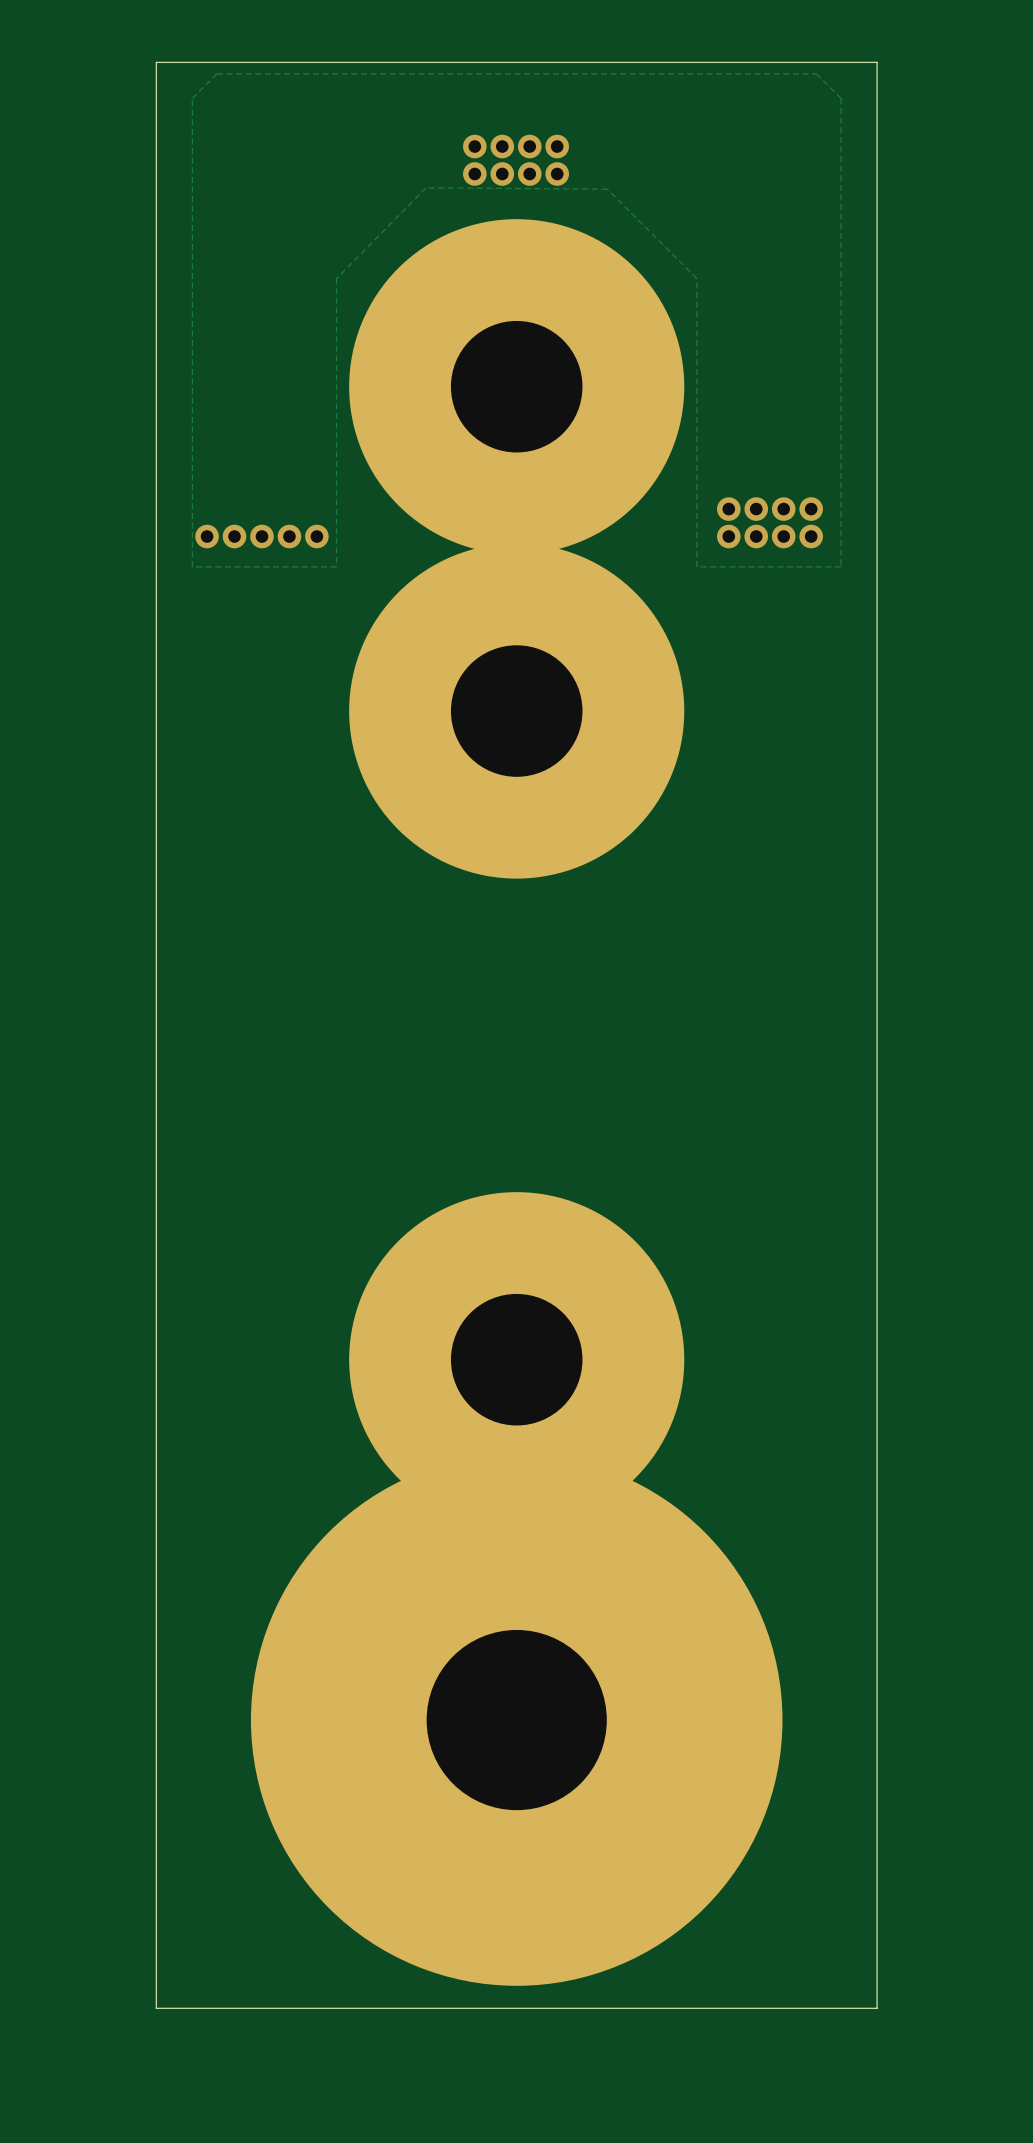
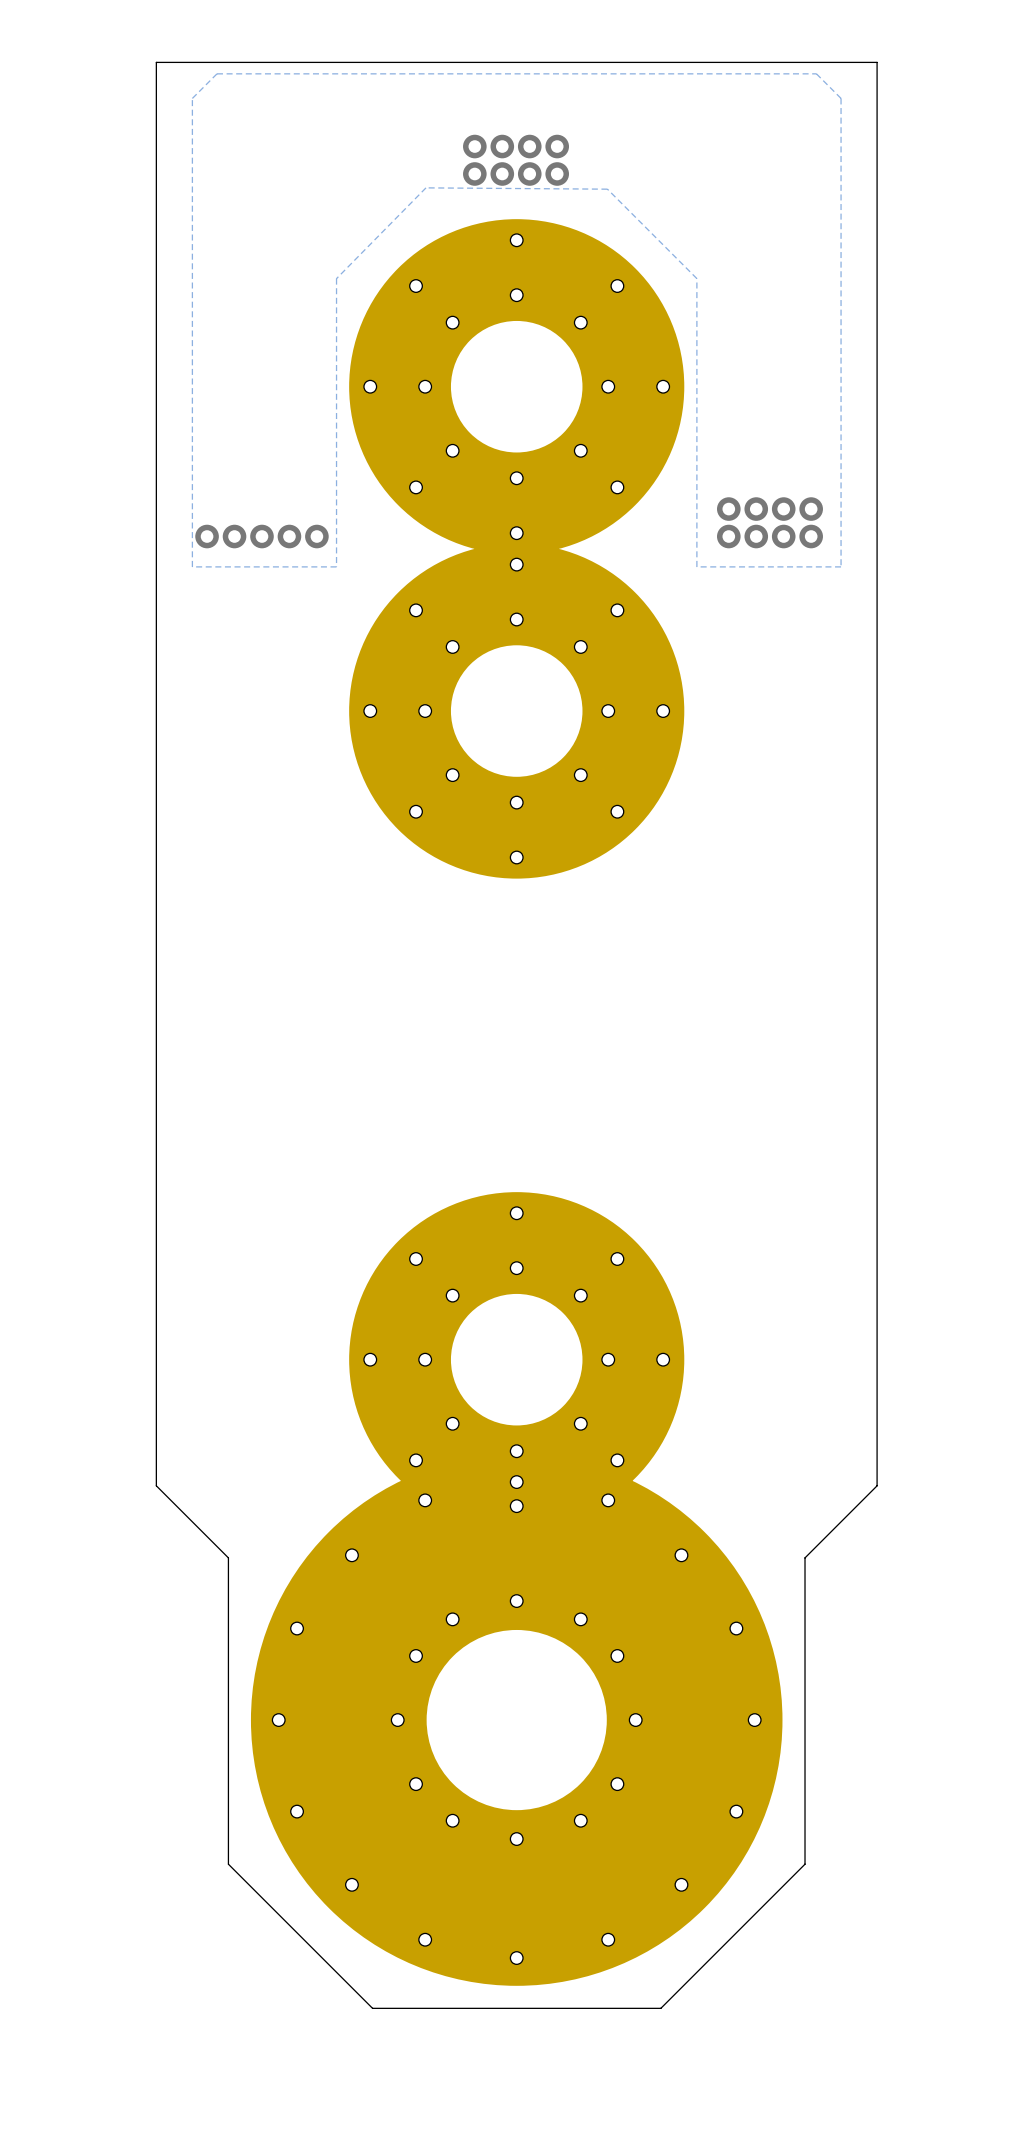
part footprint: [349, 219, 685, 555] -> [349, 219, 685, 555]
part footprint: [349, 543, 685, 879] -> [349, 543, 685, 879]
part footprint: [349, 1192, 685, 1528] -> [349, 1192, 685, 1528]
part footprint: [250, 1454, 783, 1986] -> [250, 1454, 783, 1986]
board edge: (156, 1485) (156, 2008) (372, 2008) -> (156, 1485) (228, 1557) (228, 1864) (372, 2008)
board edge: (877, 1485) (877, 2008) (660, 2008) -> (877, 1485) (805, 1557) (805, 1864) (660, 2008)

